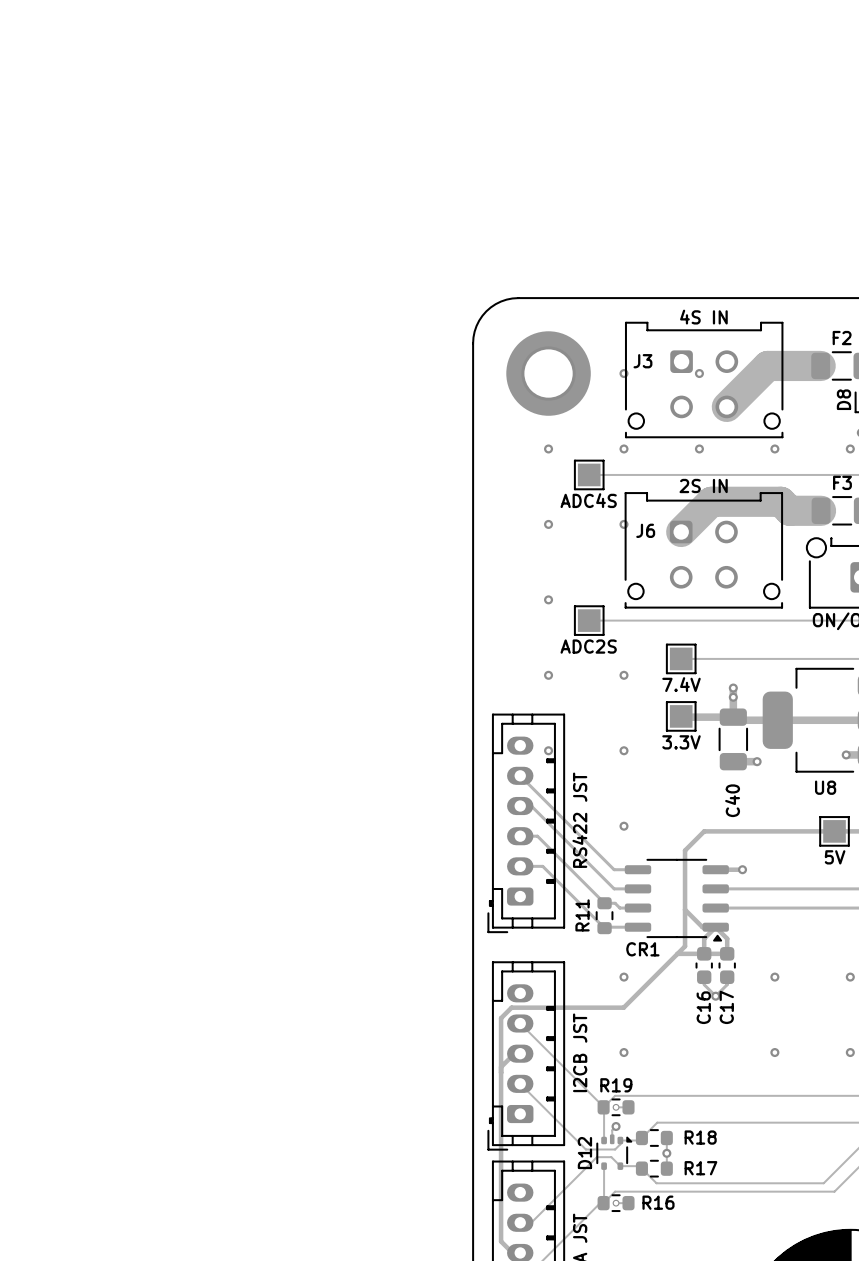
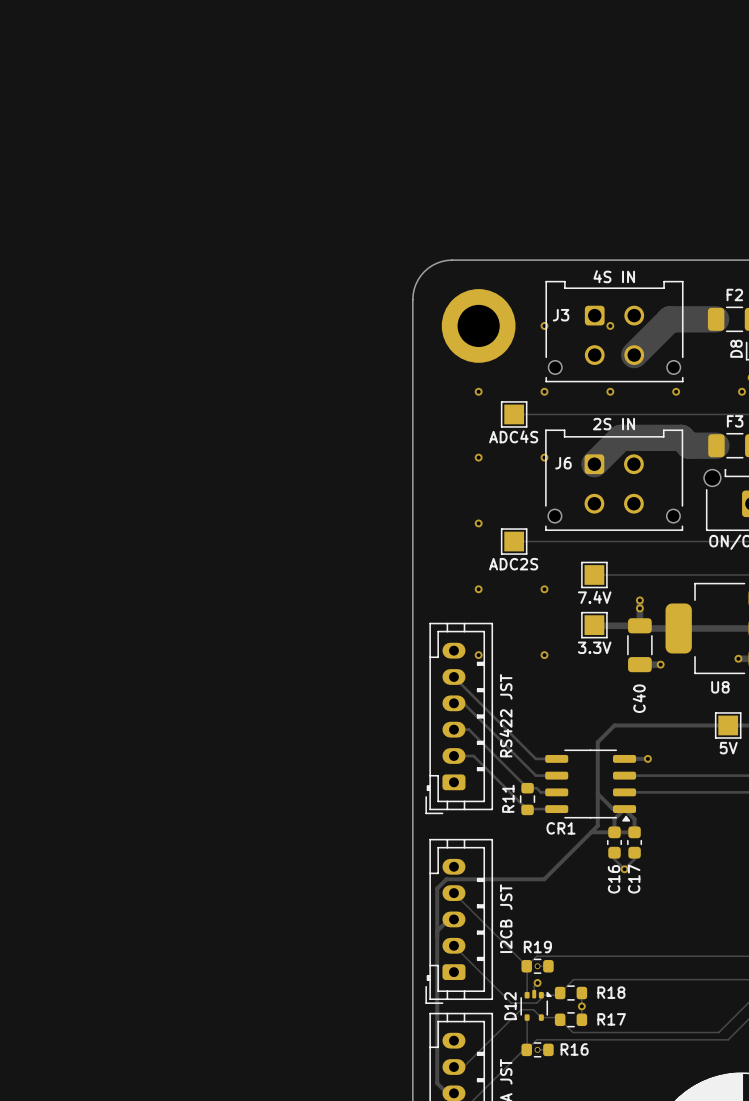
via: (623, 826) -> none
via: (623, 977) -> none
via: (774, 977) -> none
via: (850, 977) -> none
via: (623, 1052) -> none
via: (774, 1052) -> none
via: (850, 1052) -> none

